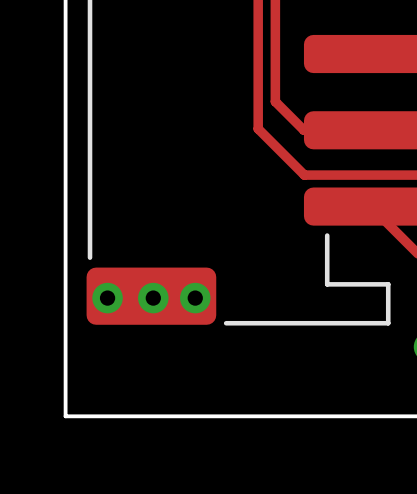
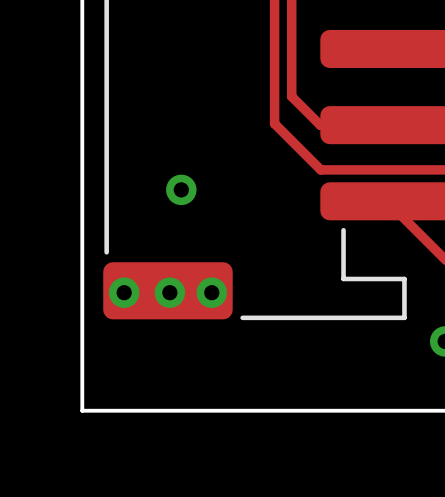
via: none -> (181, 189)

